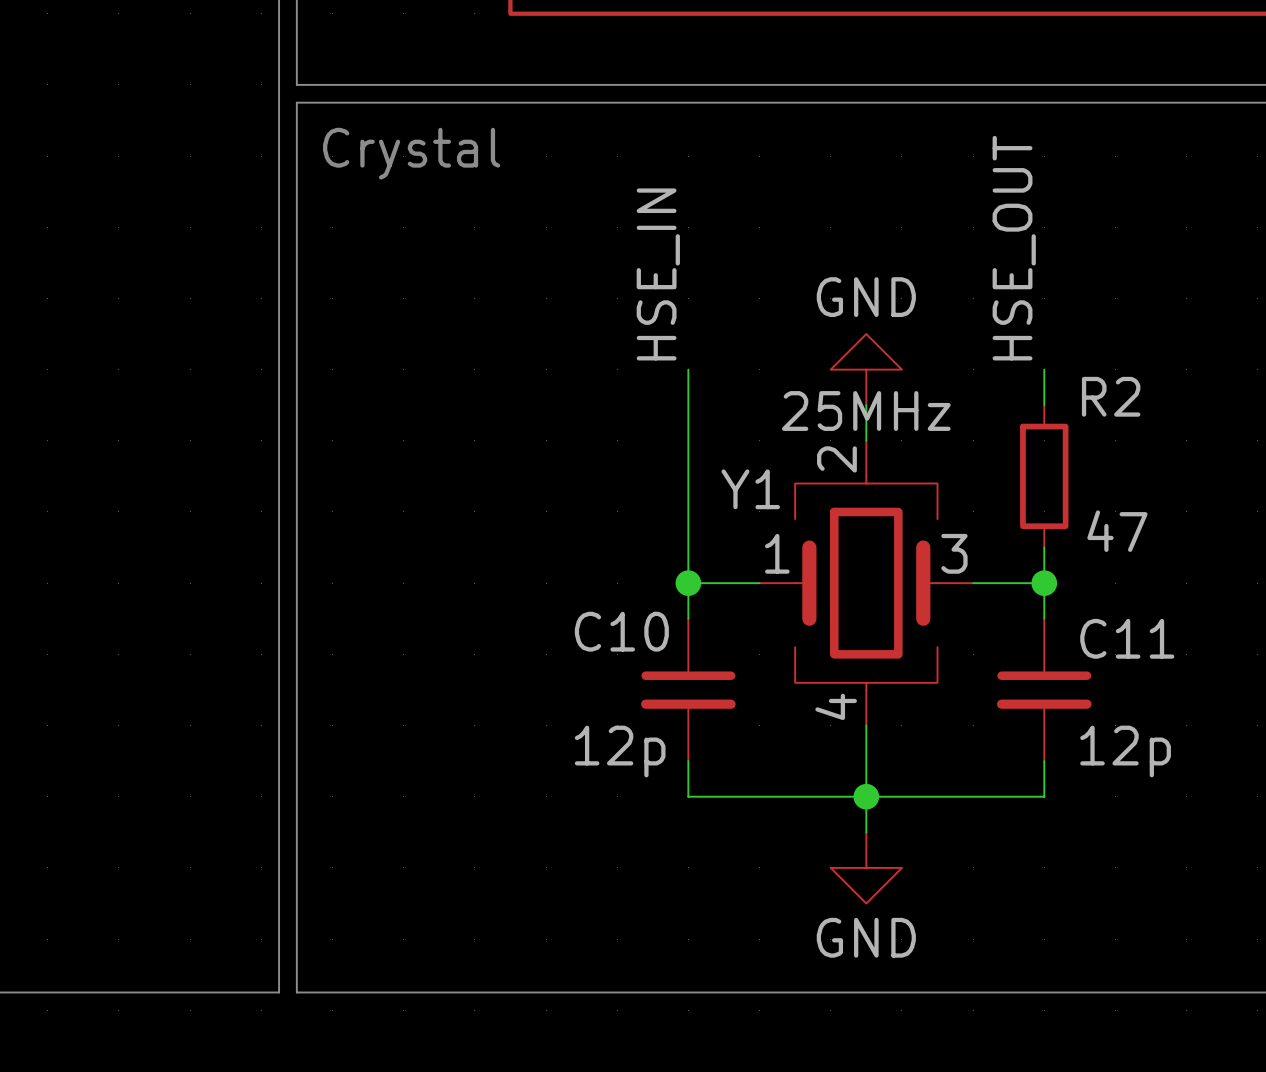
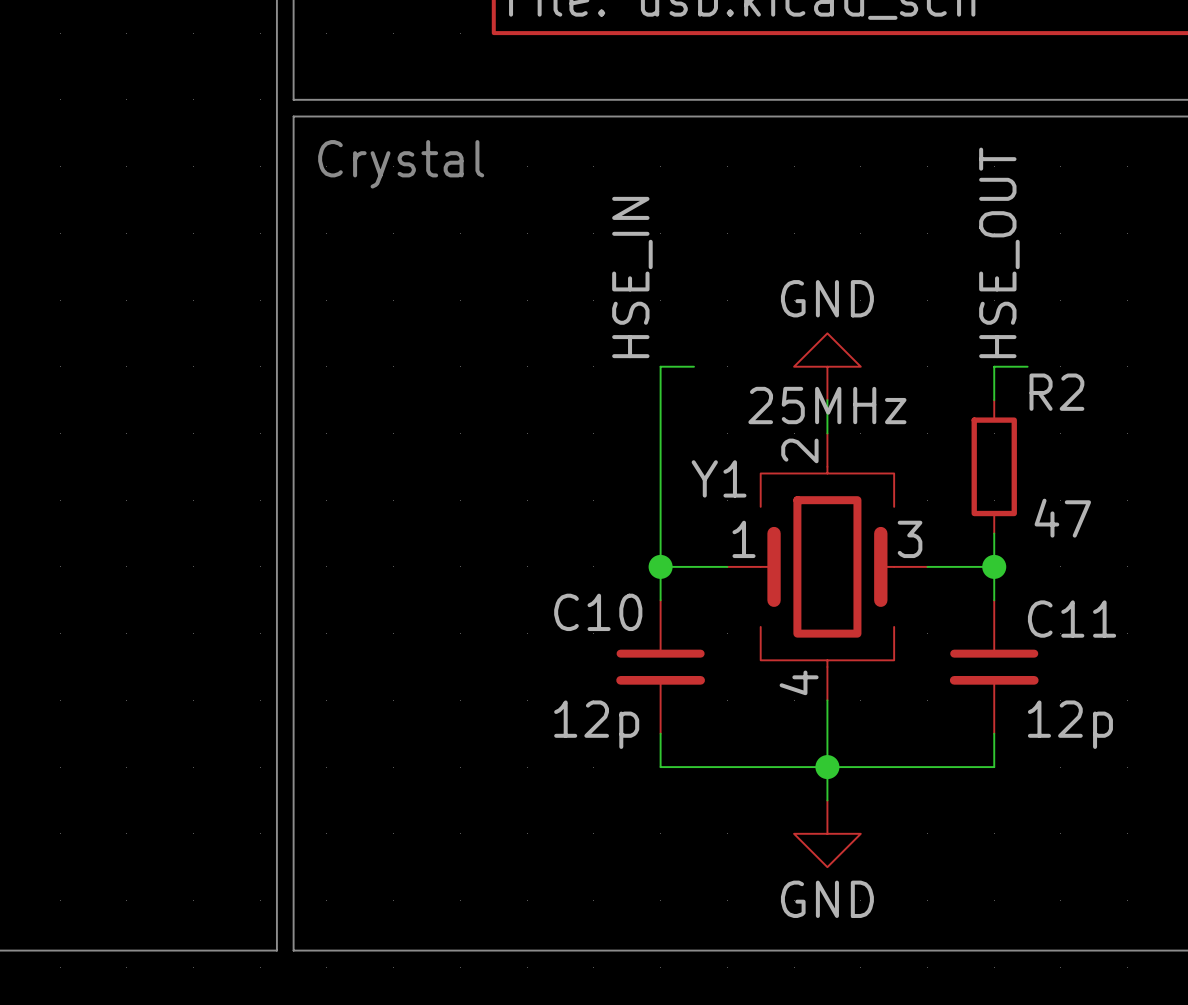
label position: HSE_OUT (1014, 248) -> HSE_OUT (999, 252)
wire: none -> (660, 366) (693, 366)
wire: none -> (994, 366) (1027, 366)

